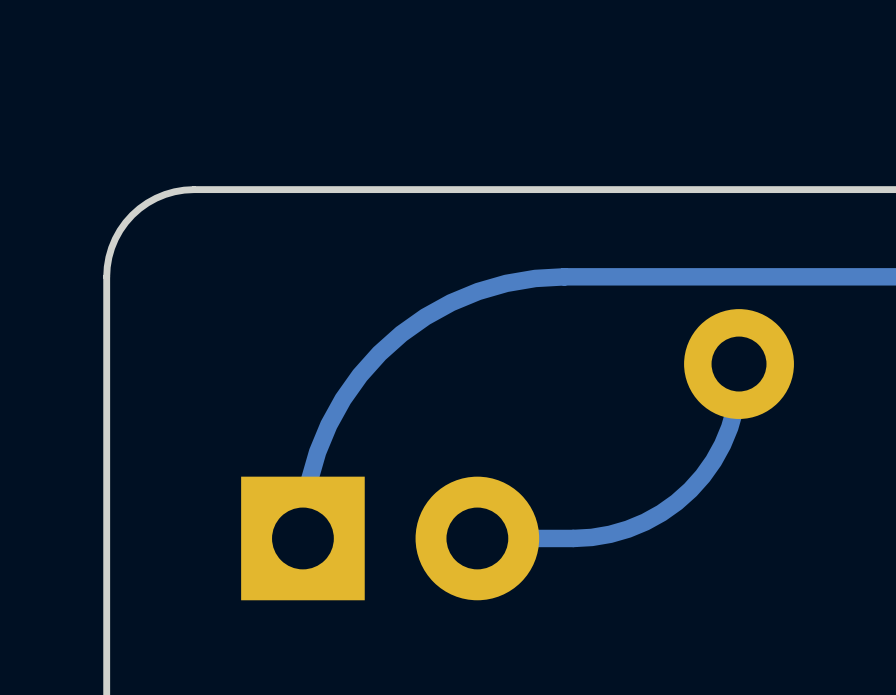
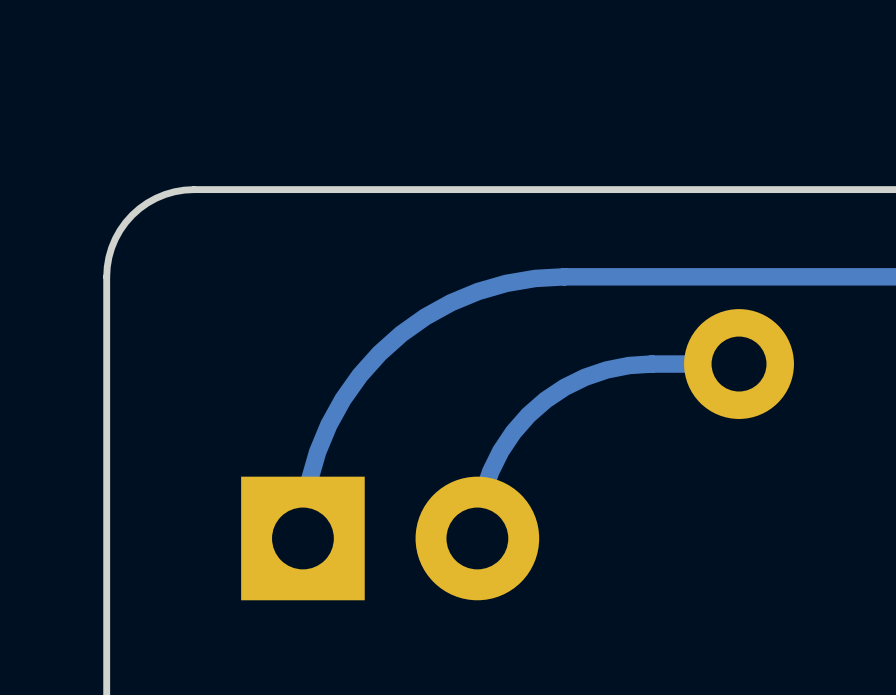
track: (739, 364) (734, 409) (722, 444) (702, 476) (690, 489) (661, 513) (628, 529) (591, 537) (477, 538) -> (739, 364) (629, 365) (585, 377) (564, 387) (528, 415) (500, 451) (483, 493) (477, 538)

